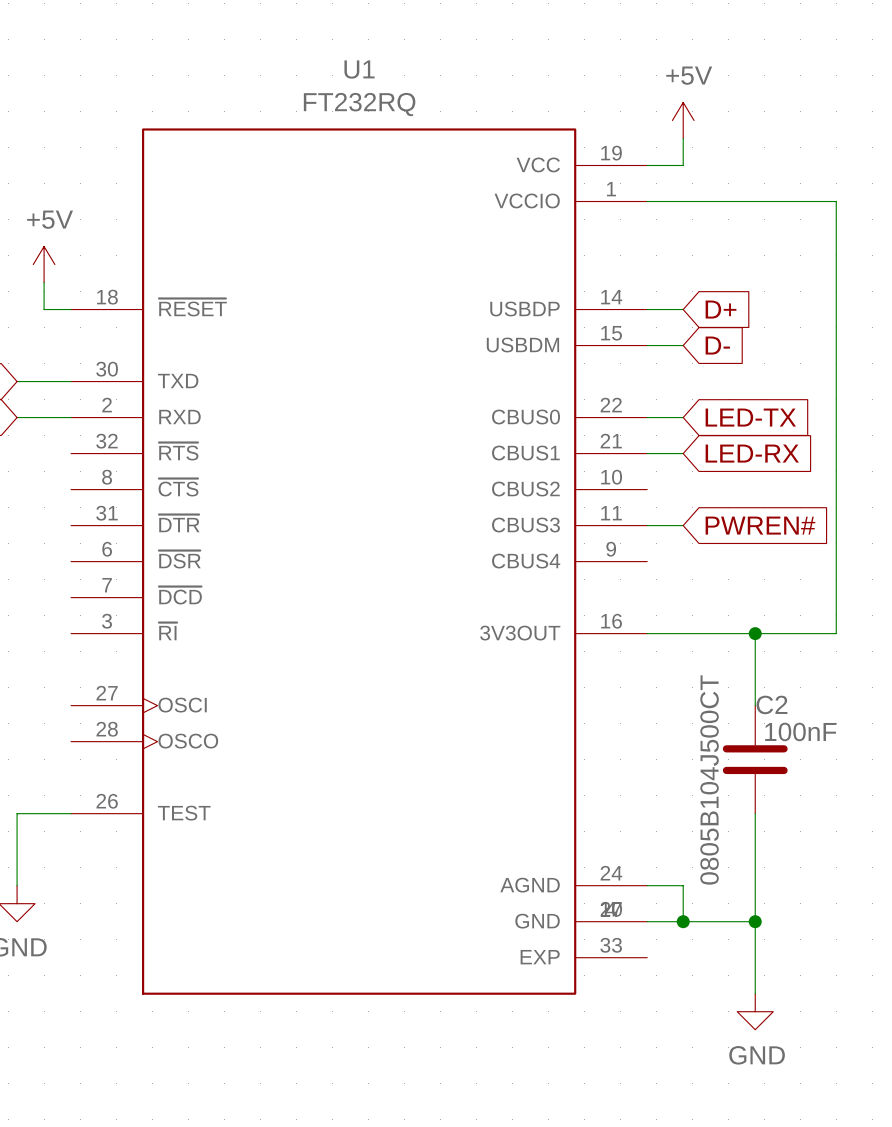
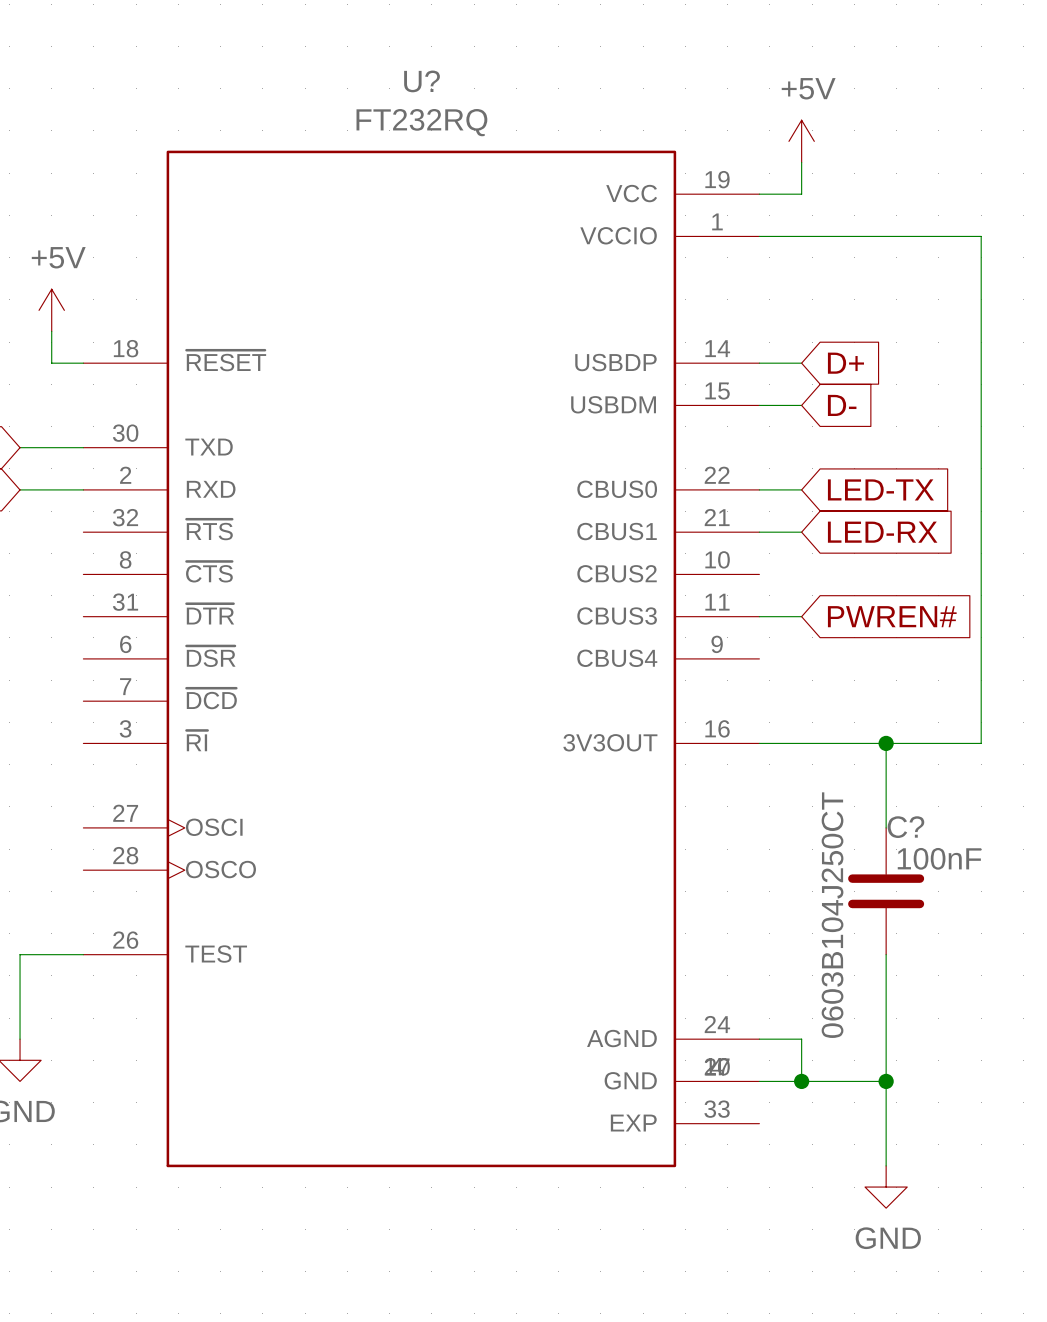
U1 name: U1 (359, 69) -> U? (422, 81)
C2 name: C2 (771, 704) -> C? (905, 827)
C2 value: 0805B104J500CT (709, 779) -> 0603B104J250CT (832, 915)

